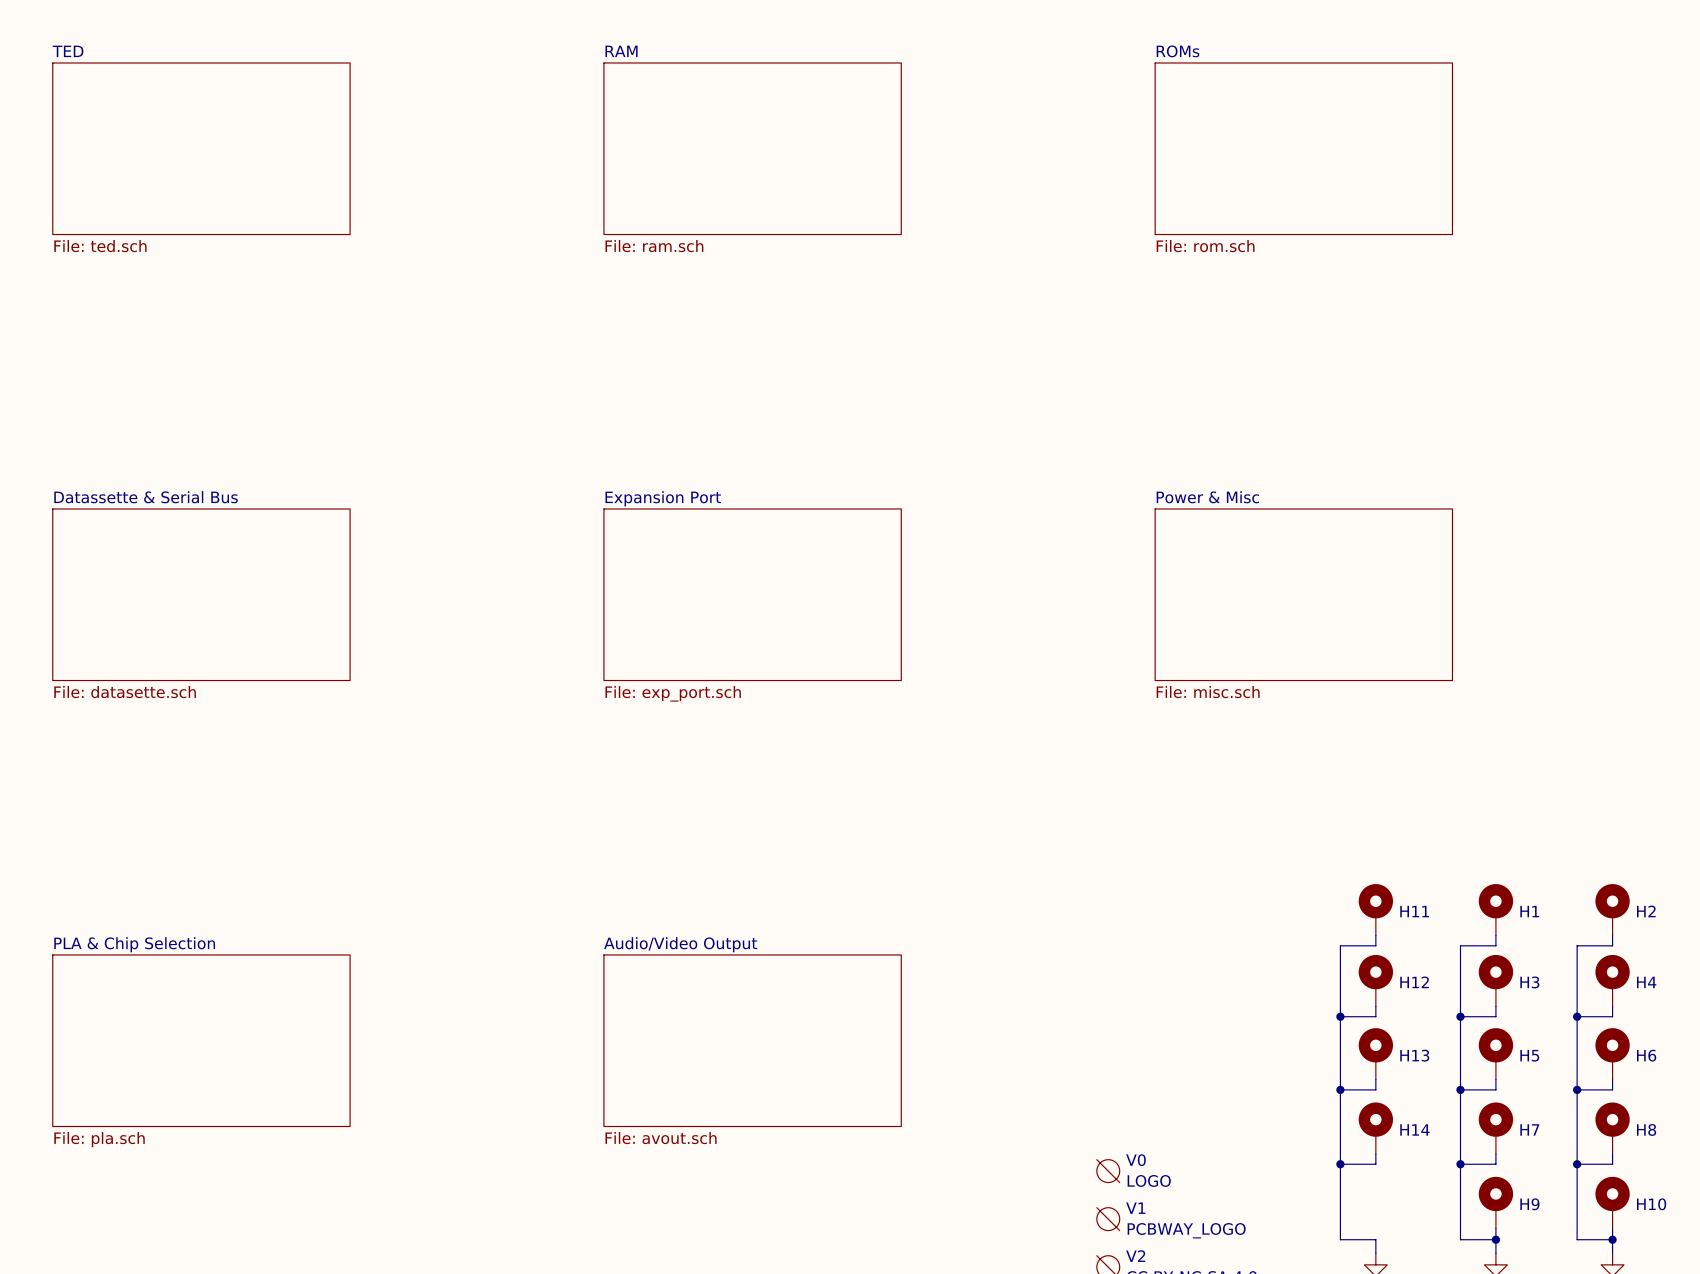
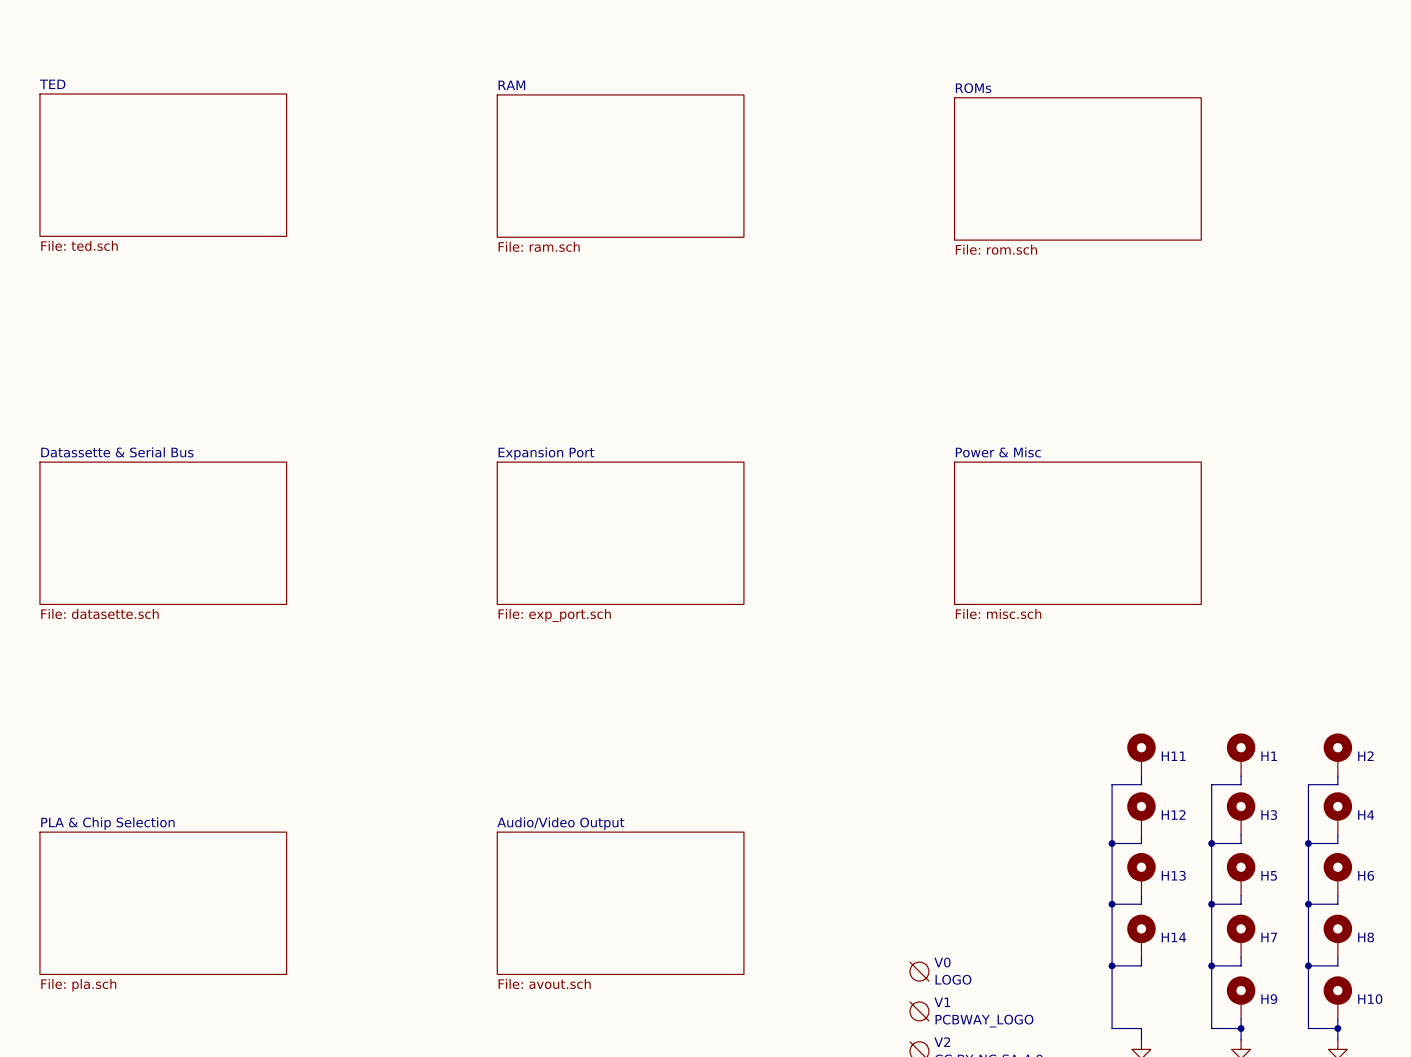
sheet TED position: (201, 148) -> (163, 165)
sheet RAM position: (752, 148) -> (620, 166)
sheet ROMs position: (1303, 148) -> (1077, 168)
sheet Datassette & Serial Bus position: (201, 594) -> (163, 533)
sheet Expansion Port position: (752, 594) -> (620, 533)
sheet Power & Misc position: (1303, 594) -> (1077, 533)
sheet PLA & Chip Selection position: (201, 1040) -> (163, 903)
sheet Audio/Video Output position: (752, 1040) -> (620, 903)

